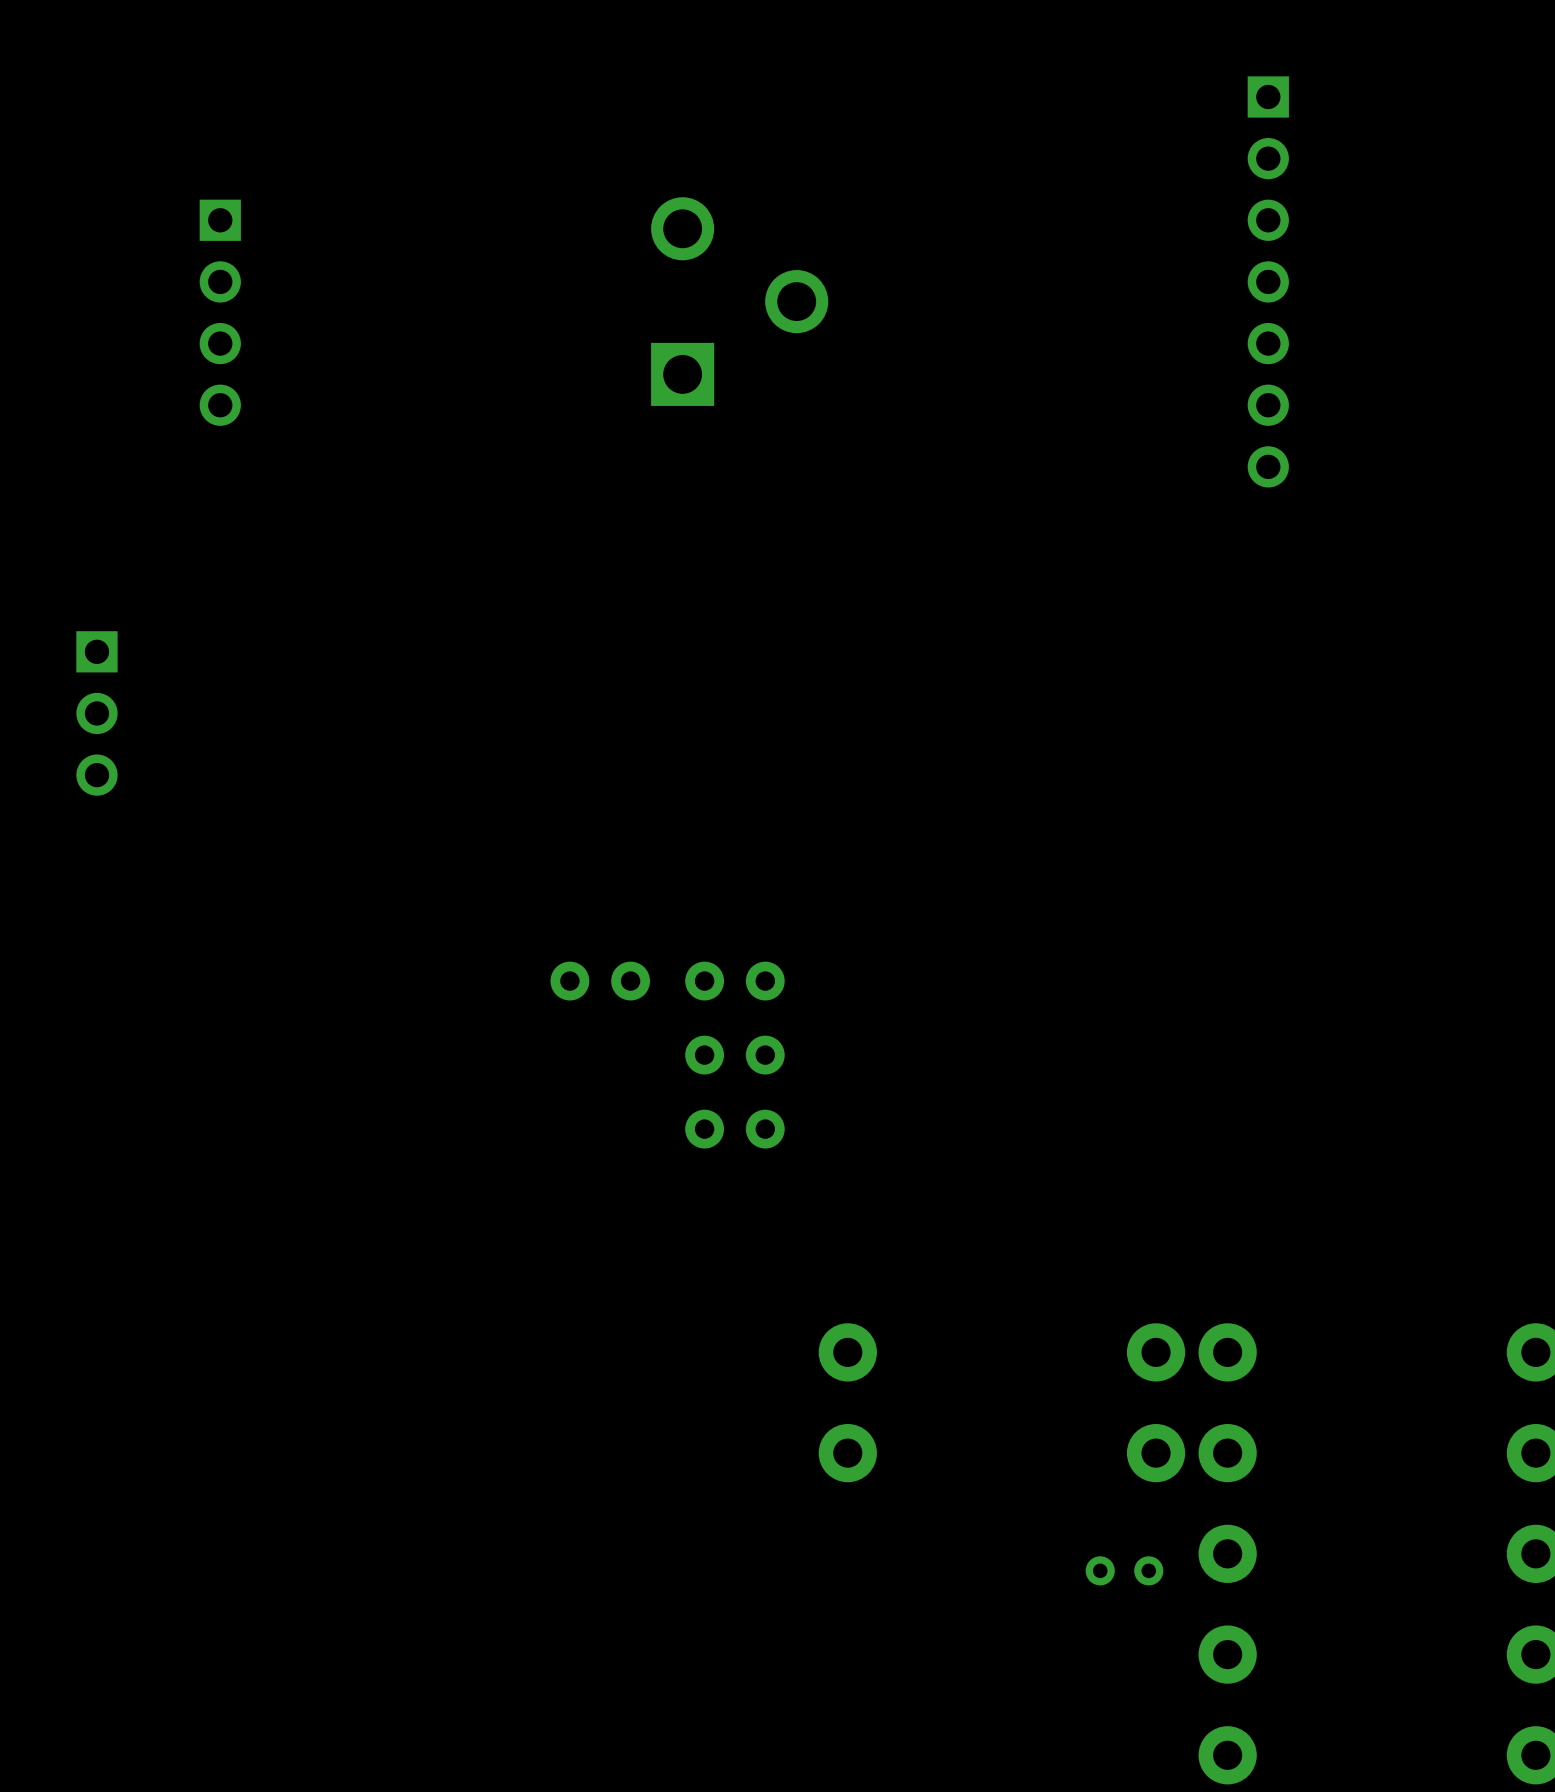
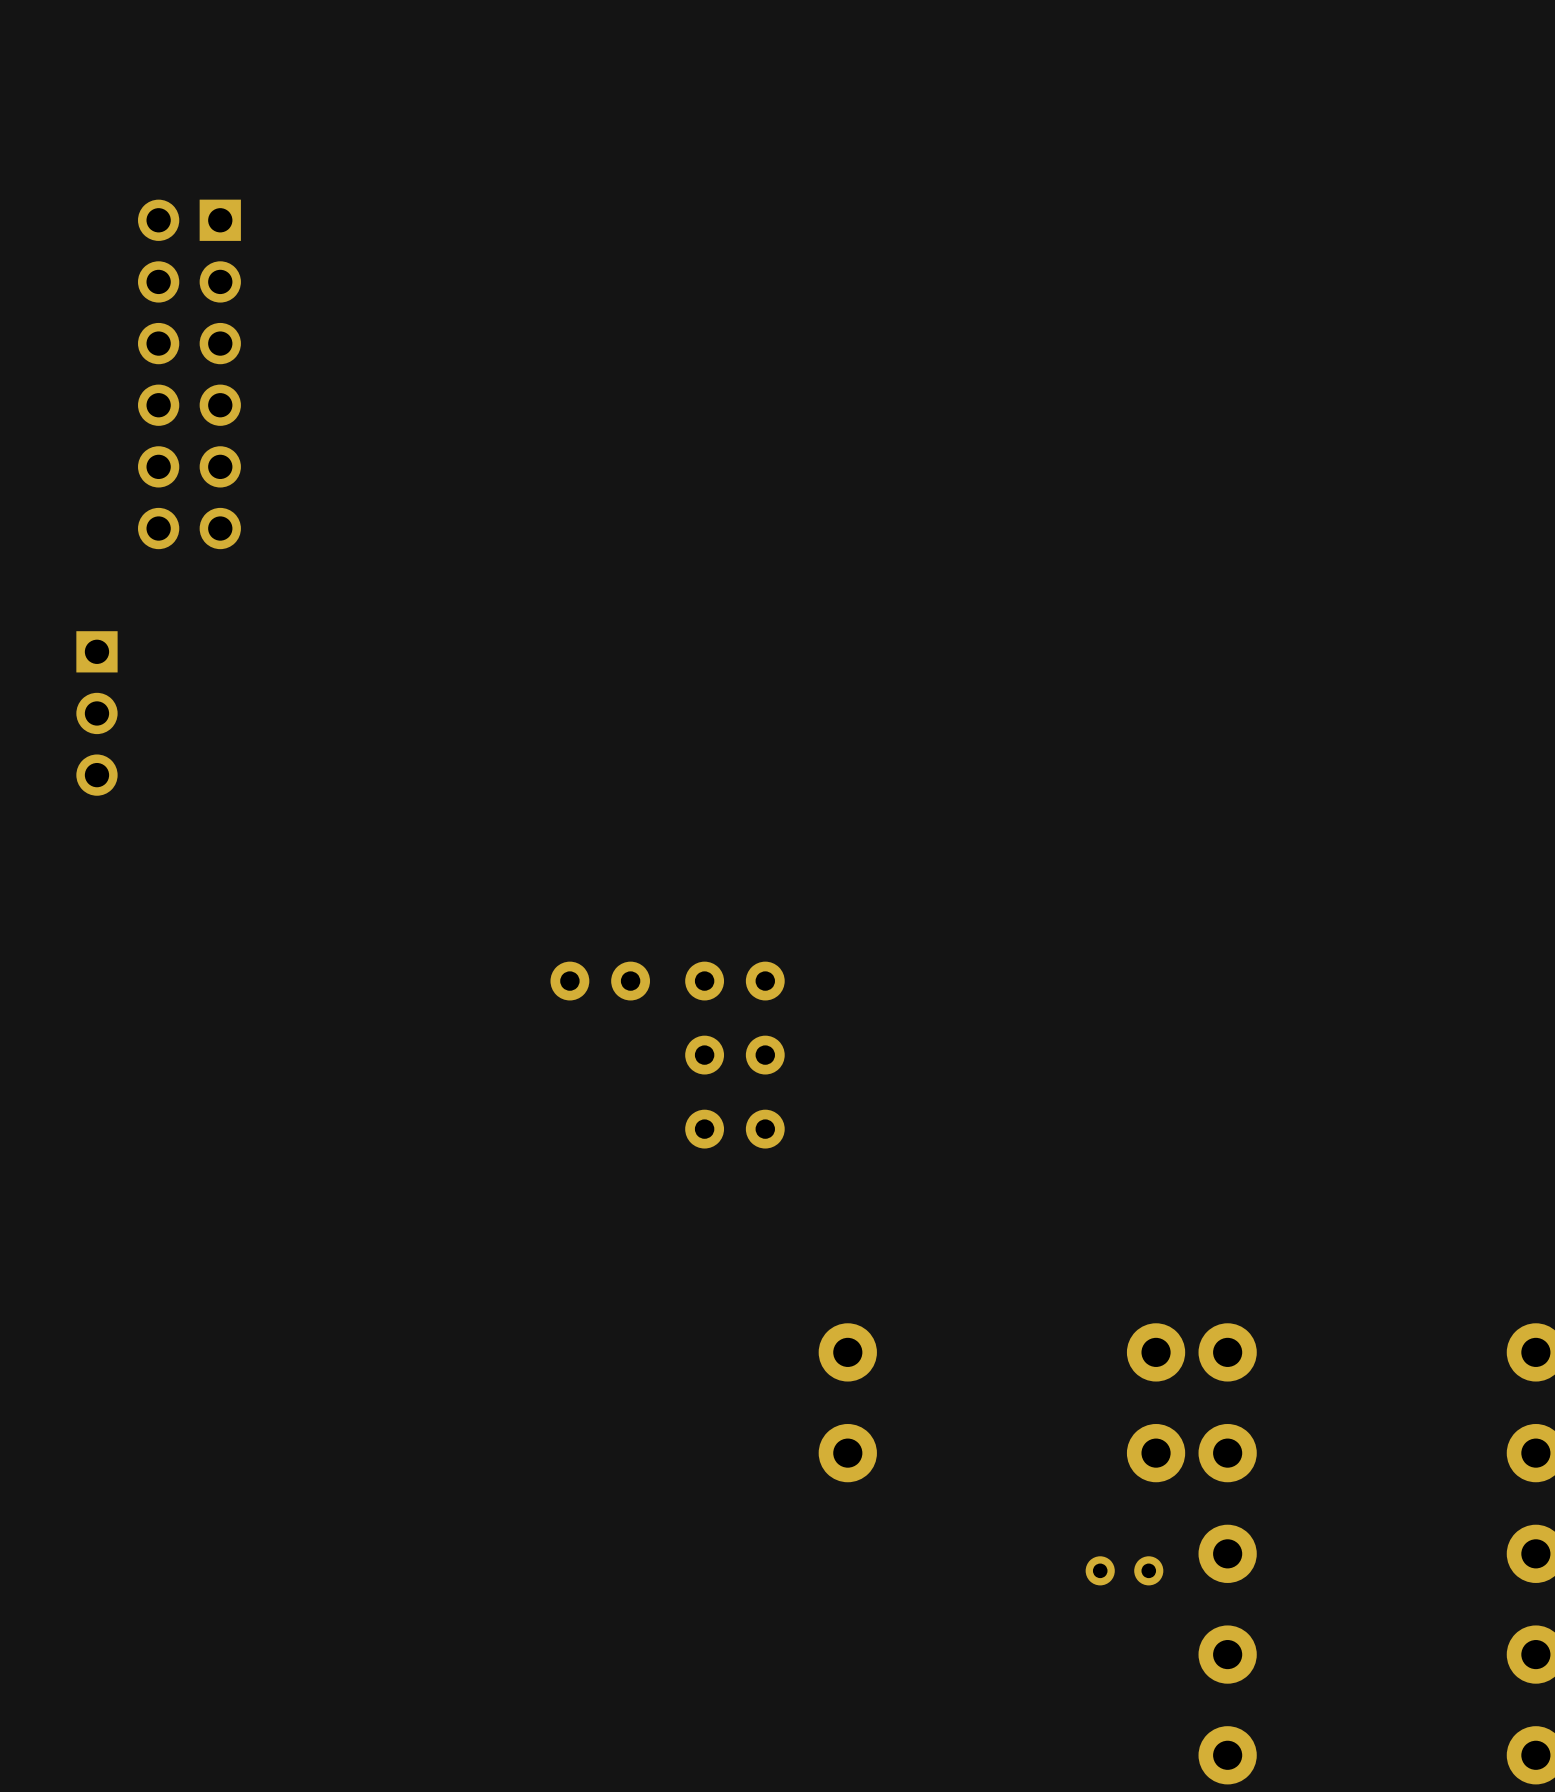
part: (1268, 281) -> none
part: (739, 301) -> none
part: none -> (189, 374)

